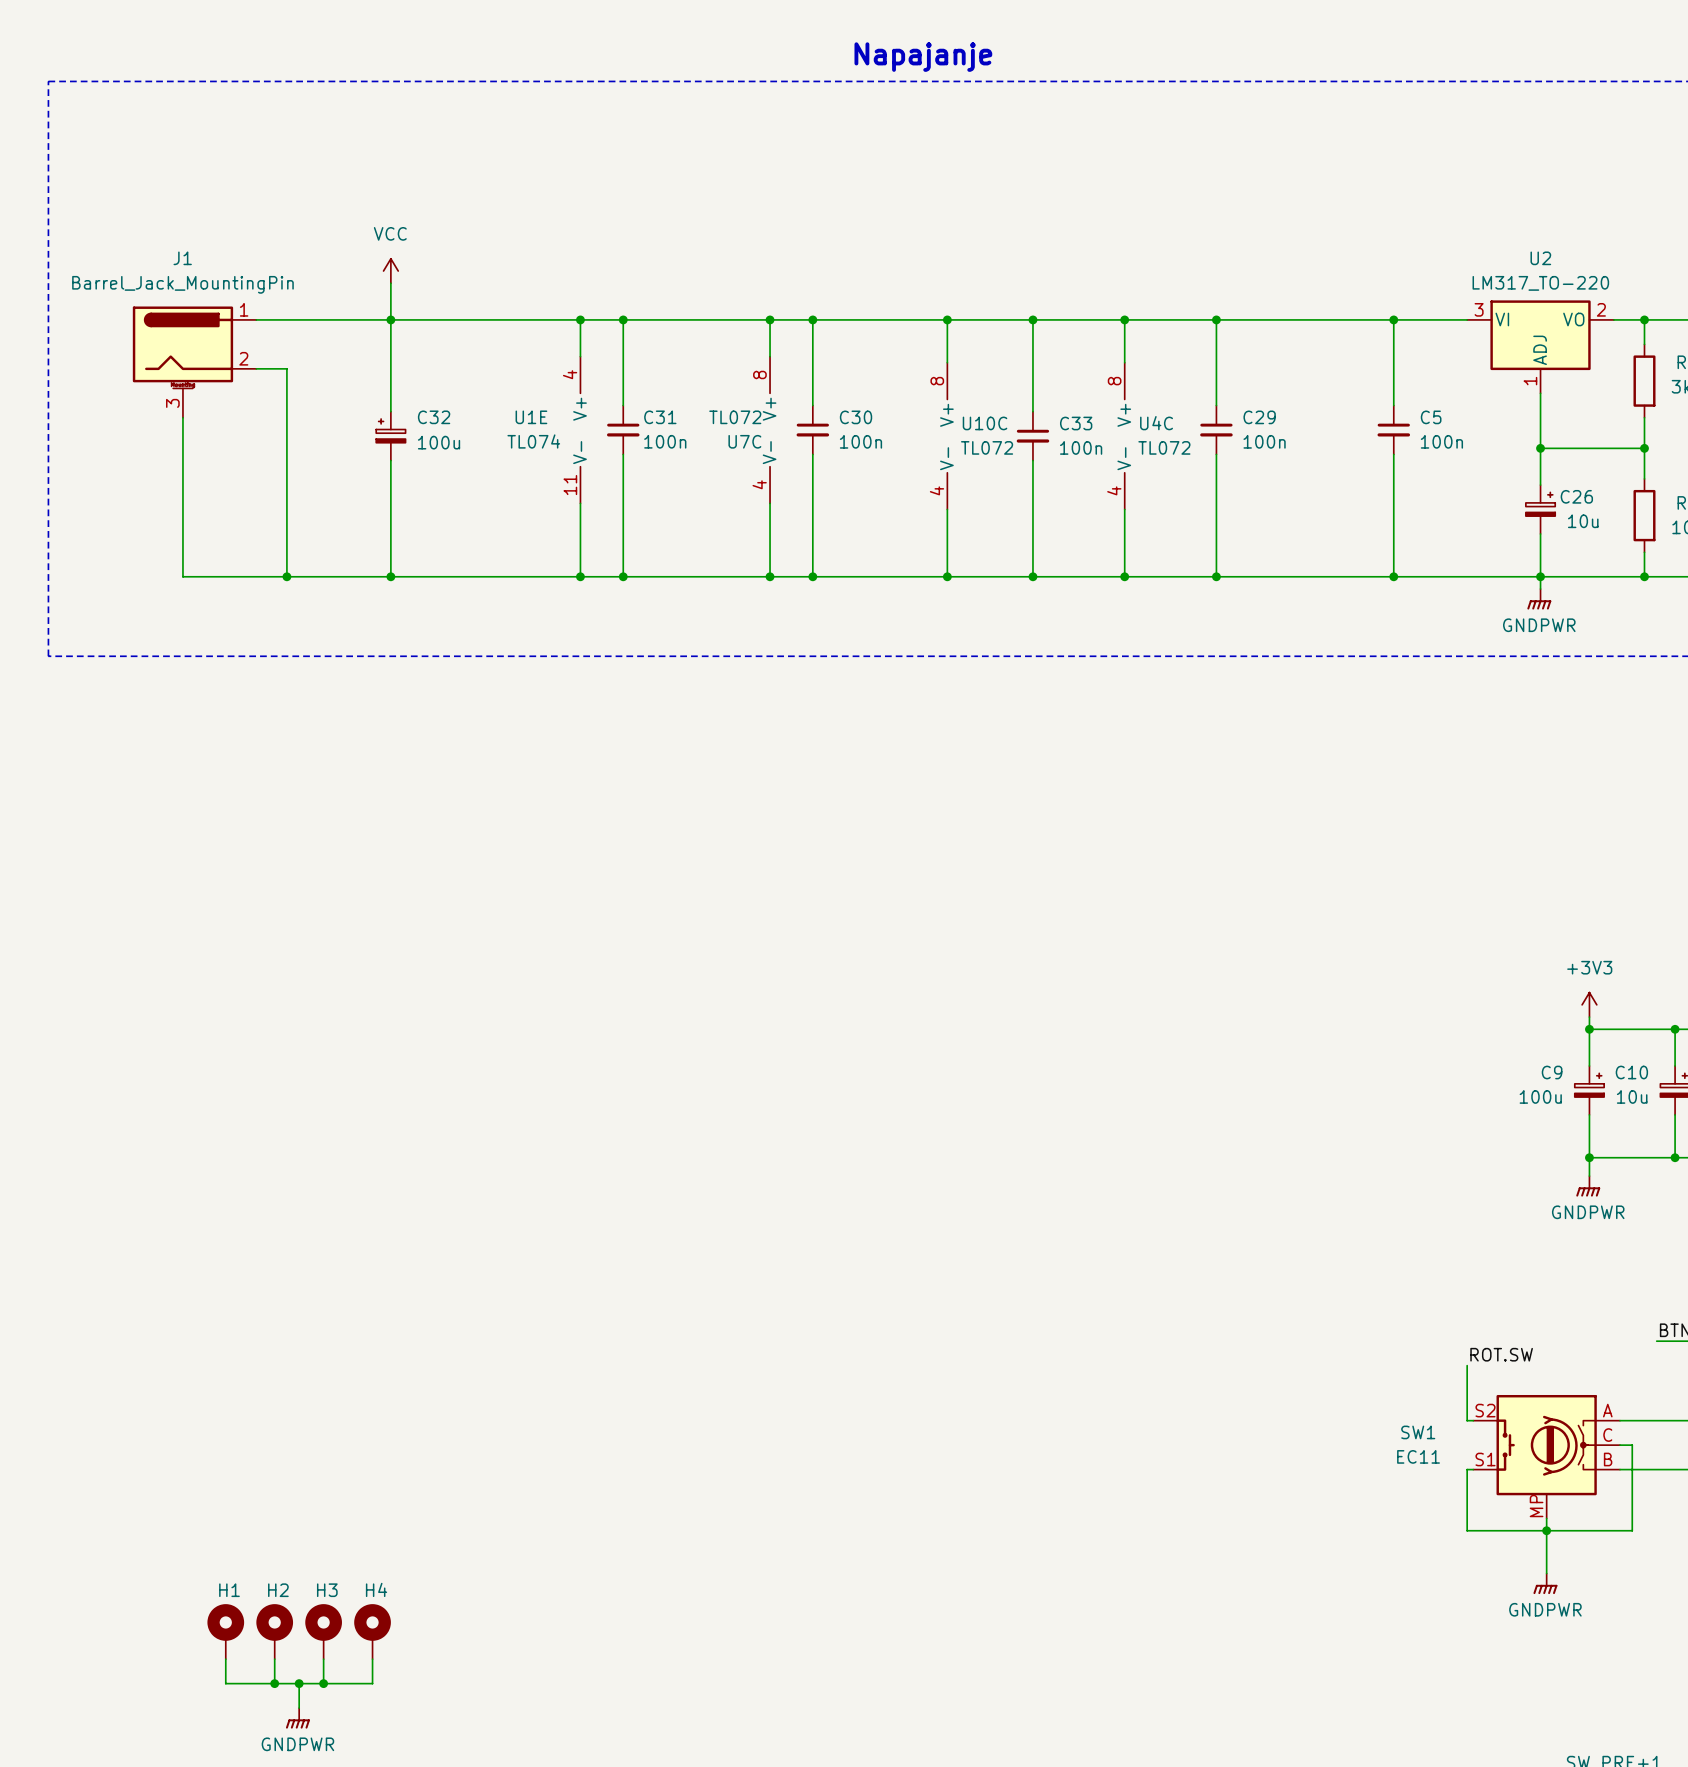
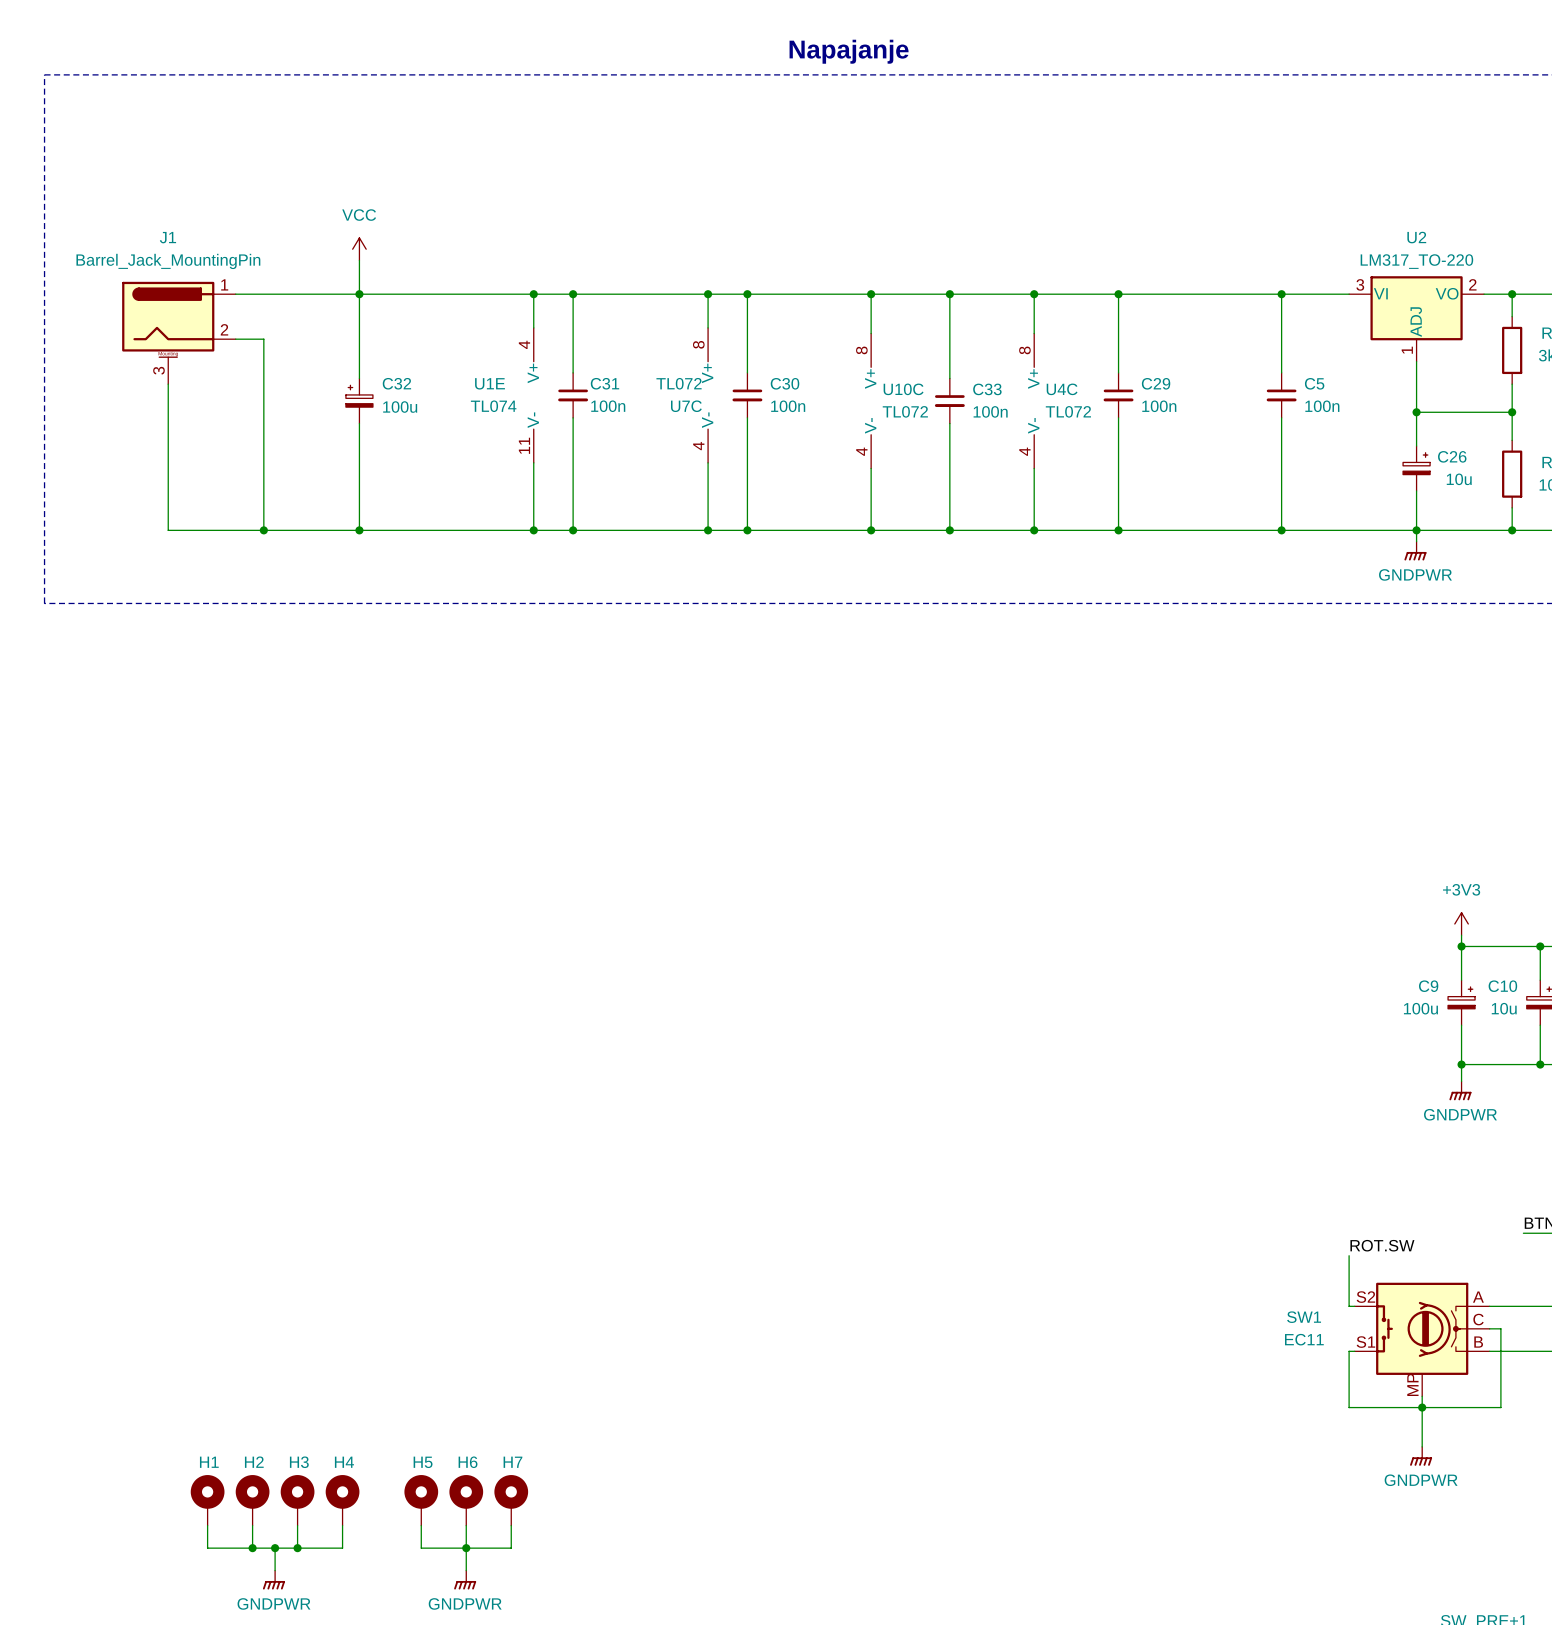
H5: none -> (421, 1500)
H6: none -> (466, 1500)
H7: none -> (511, 1500)
wire: none -> (421, 1525) (421, 1548) (511, 1548) (511, 1525)
wire: none -> (466, 1525) (466, 1570)
junction: none -> (466, 1548)
power symbol: none -> GNDPWR (465, 1580)

